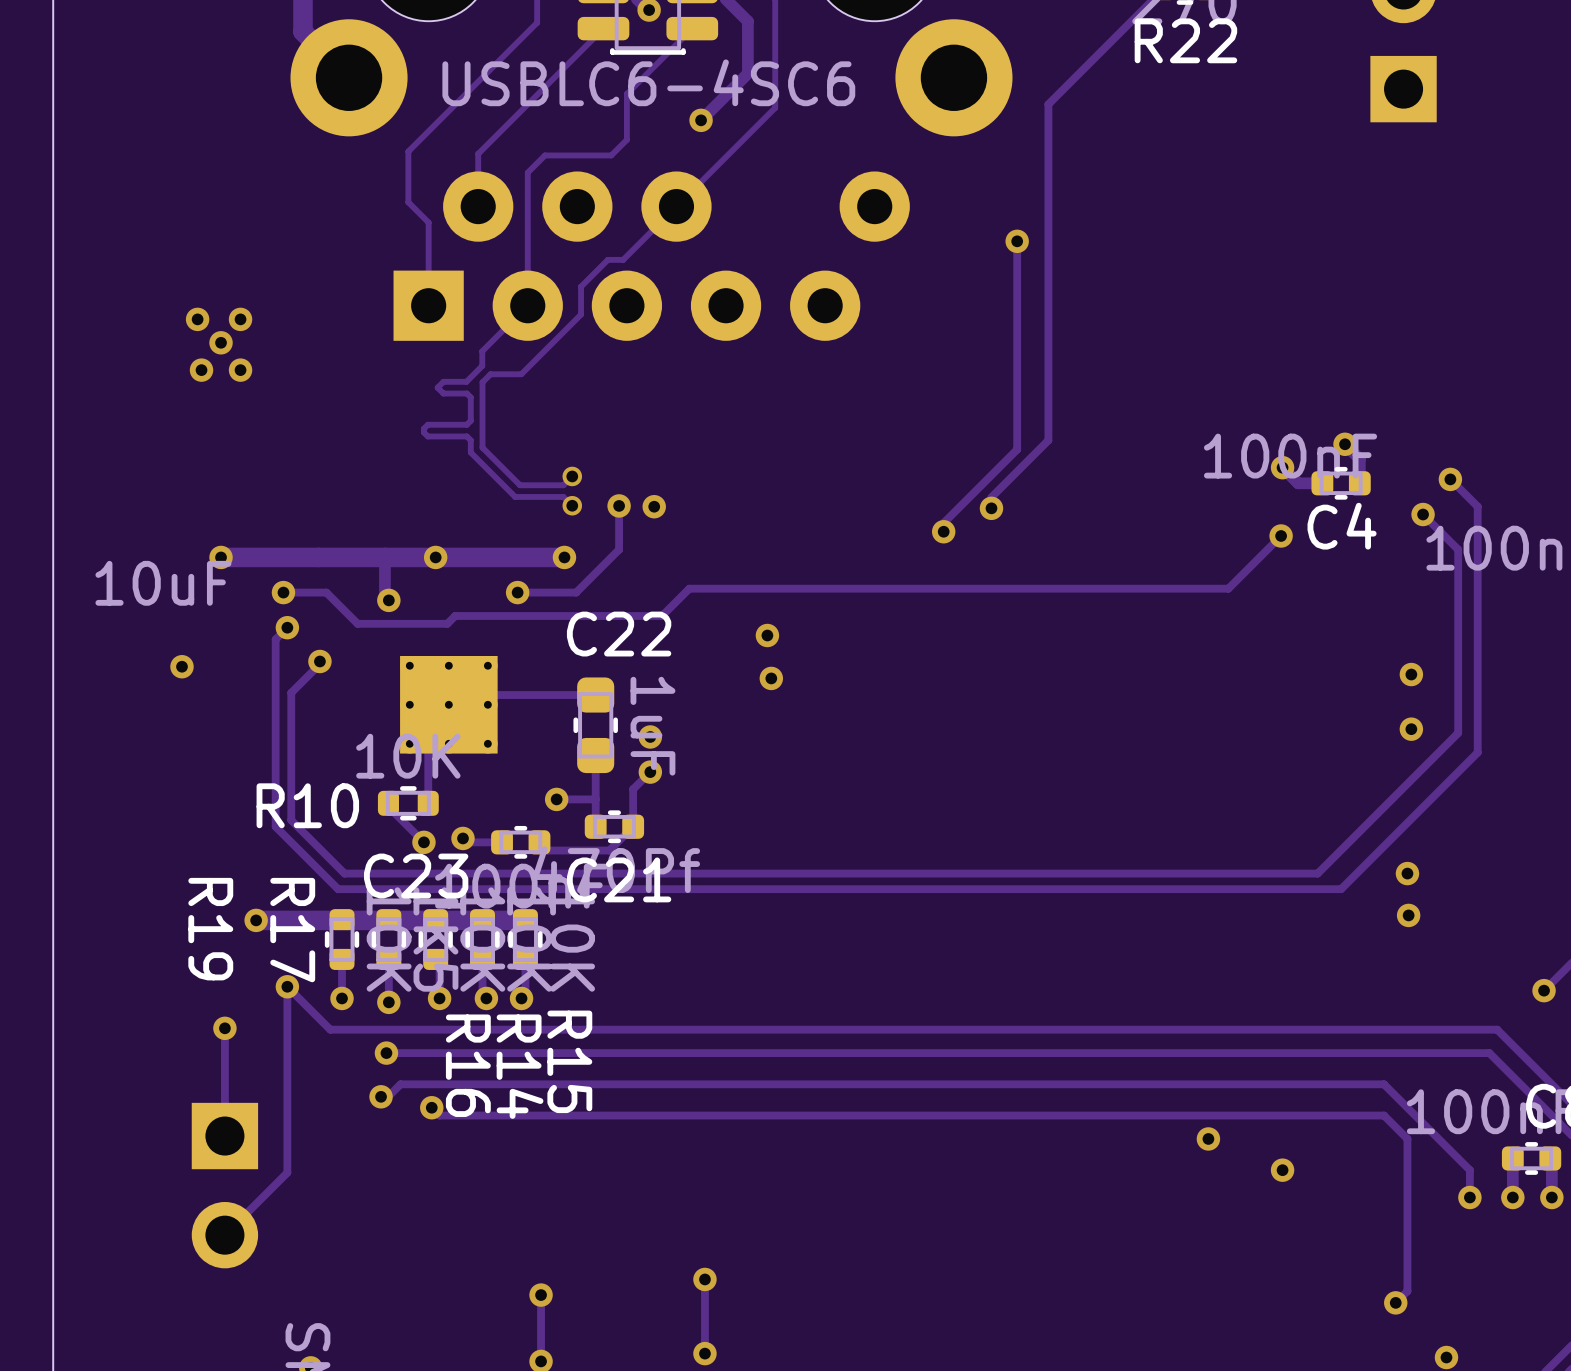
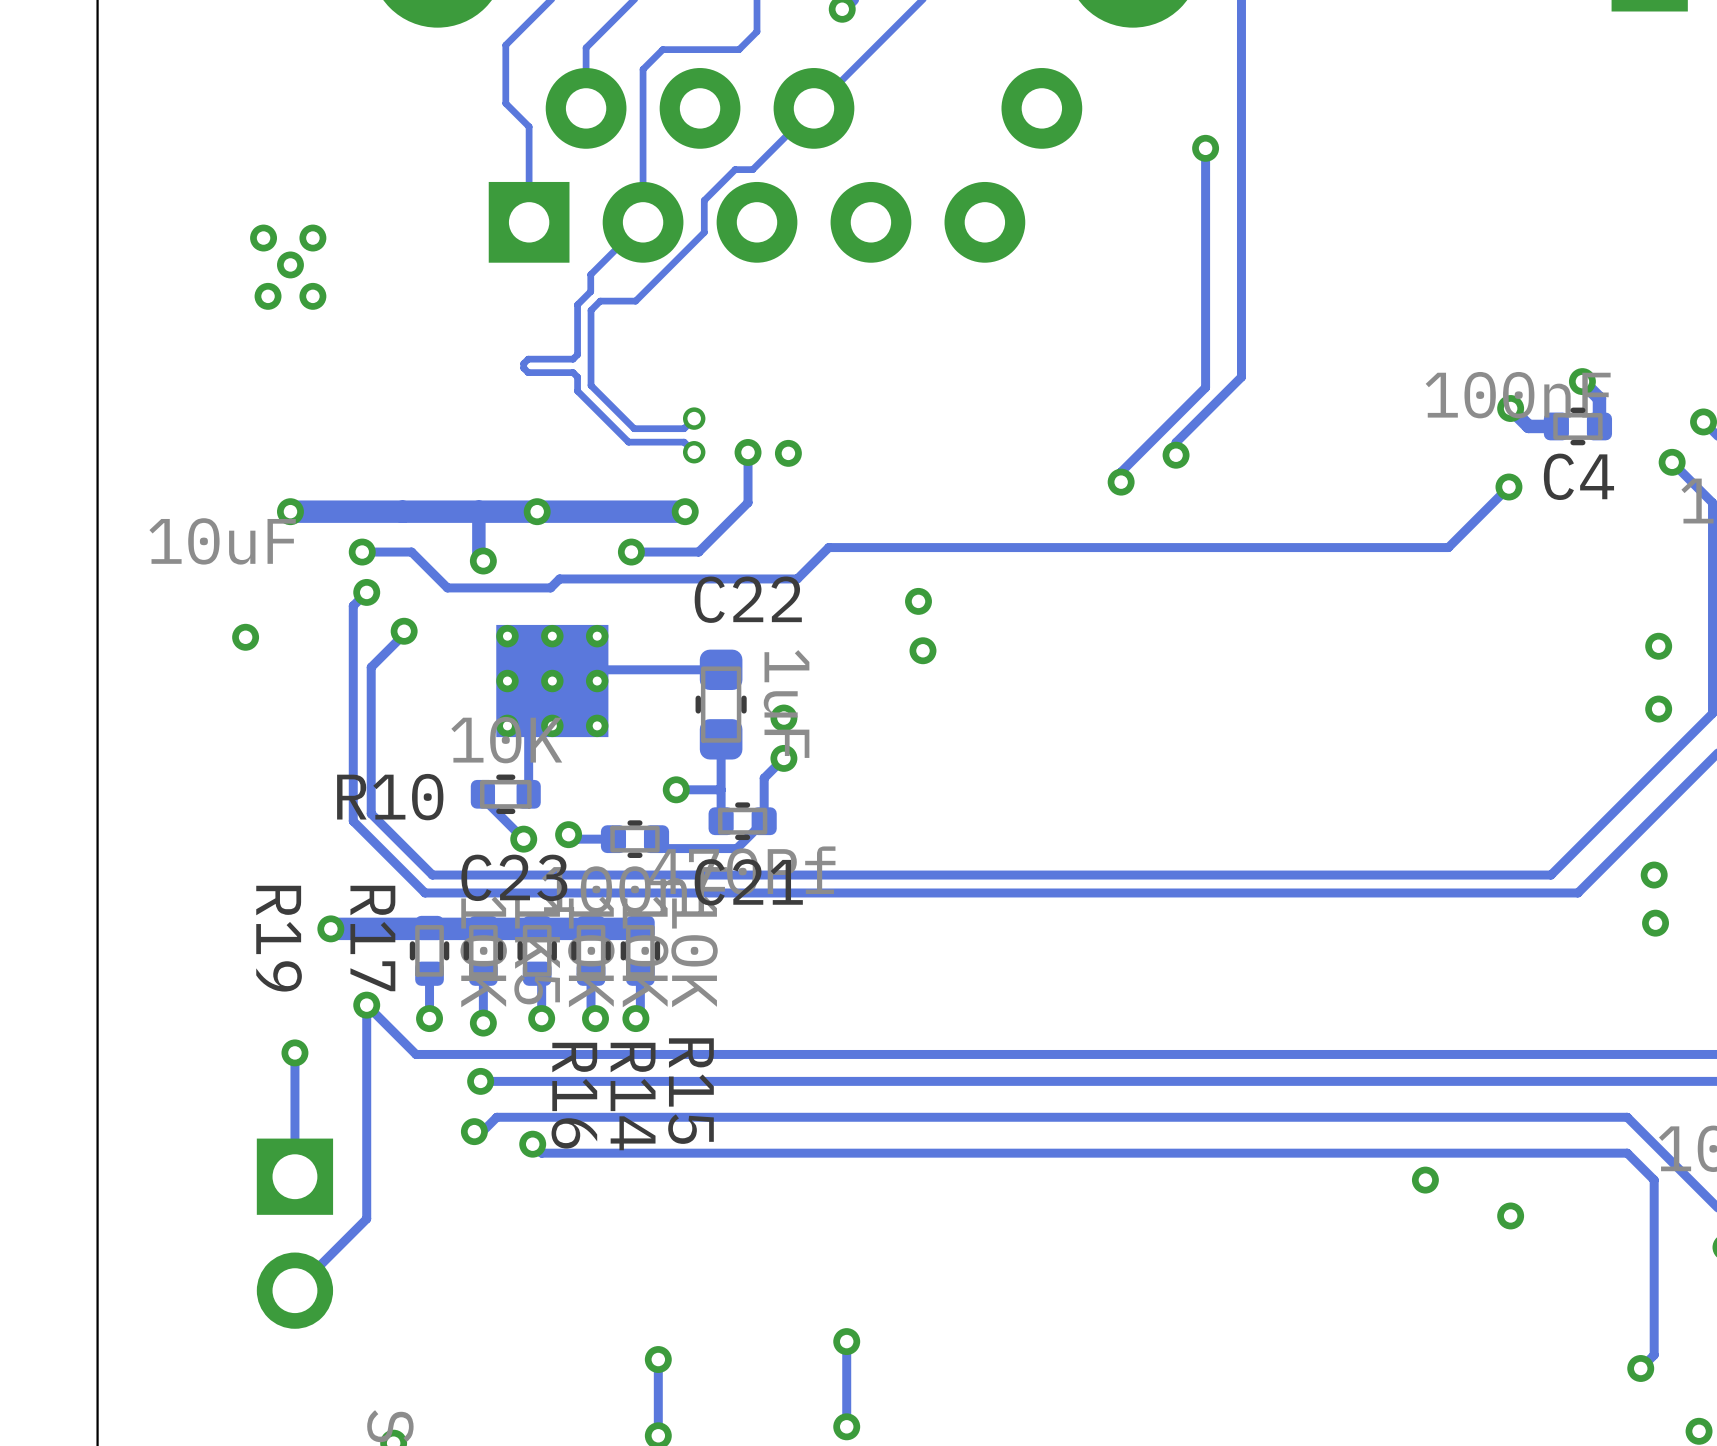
track: (470, 377) (466, 381) (443, 381) (437, 387) (443, 393) (466, 393) (470, 397) -> (577, 304) (577, 327)

